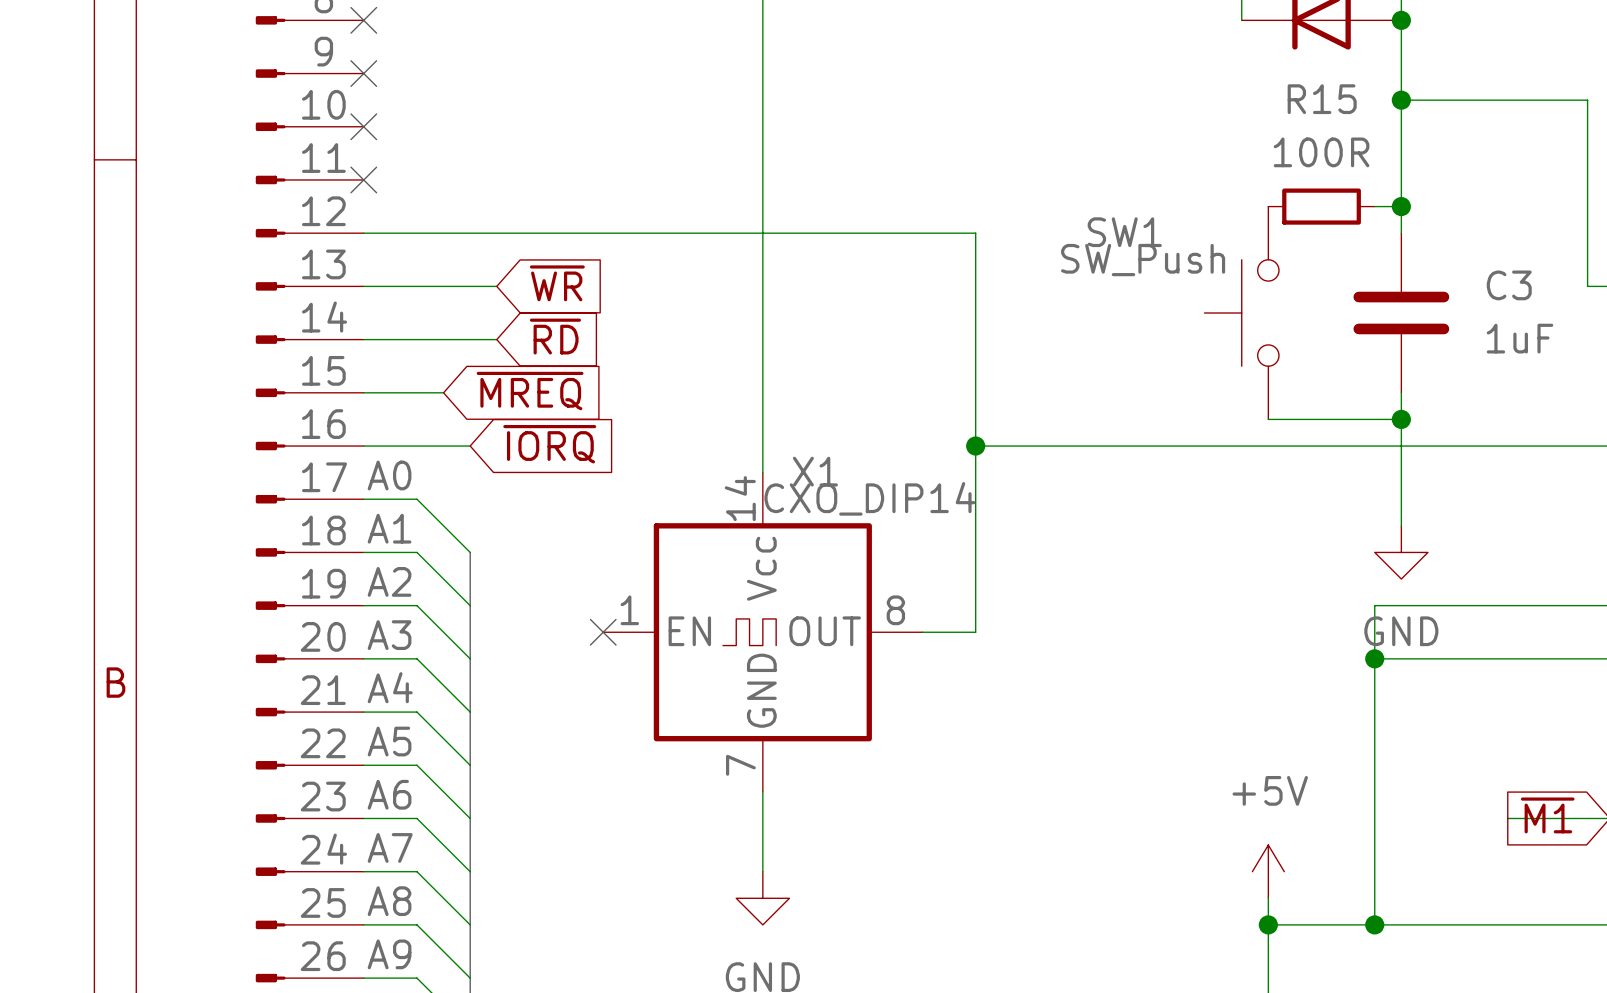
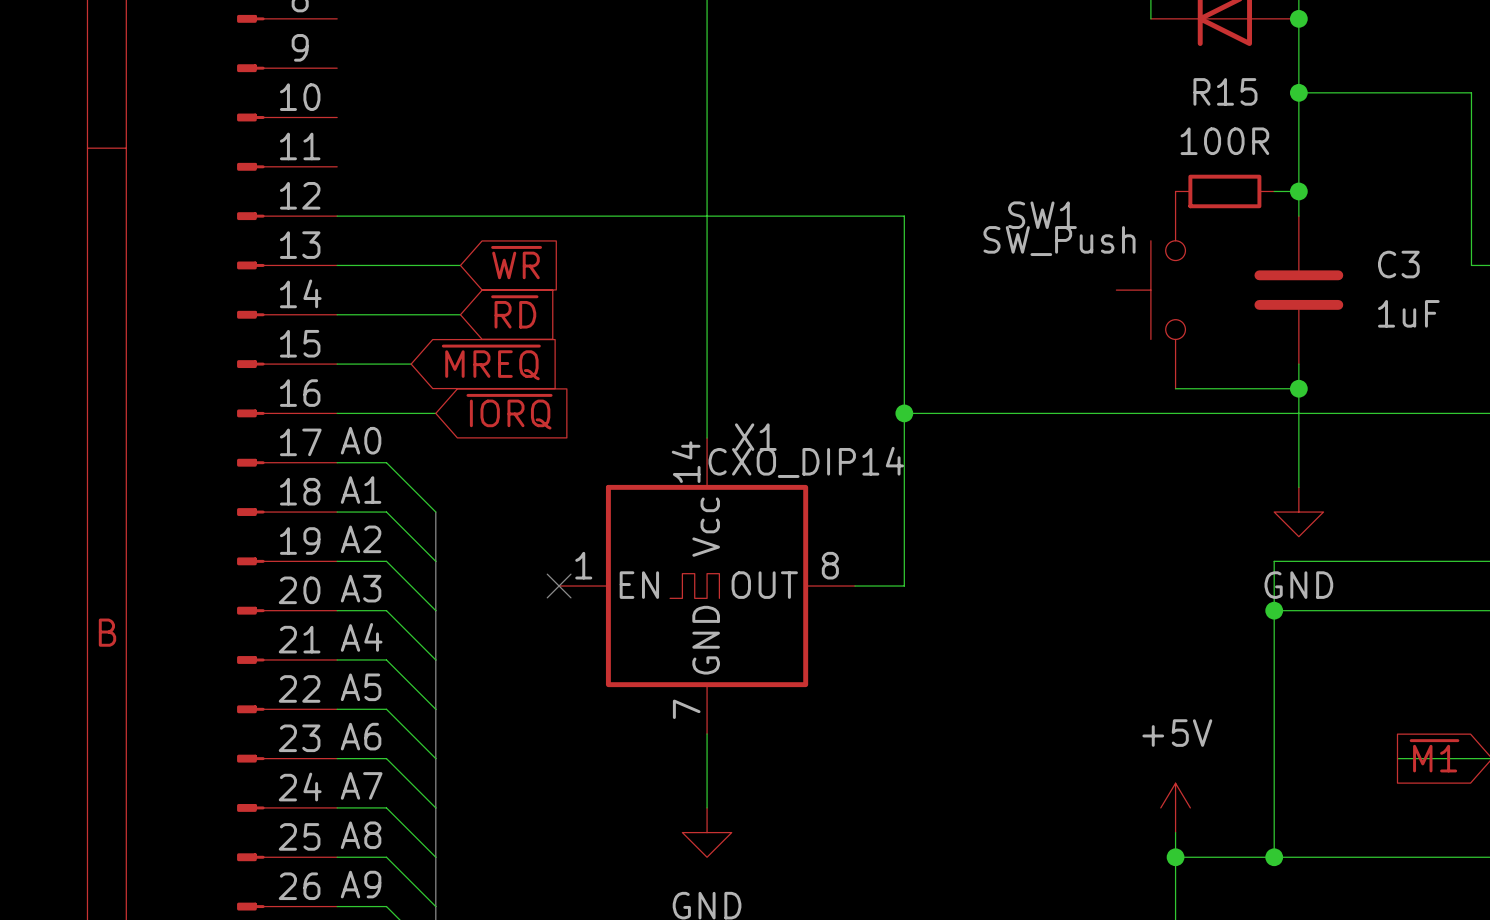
no-connect mark: (363, 20) -> none
no-connect mark: (363, 73) -> none
no-connect mark: (363, 126) -> none
no-connect mark: (363, 179) -> none

